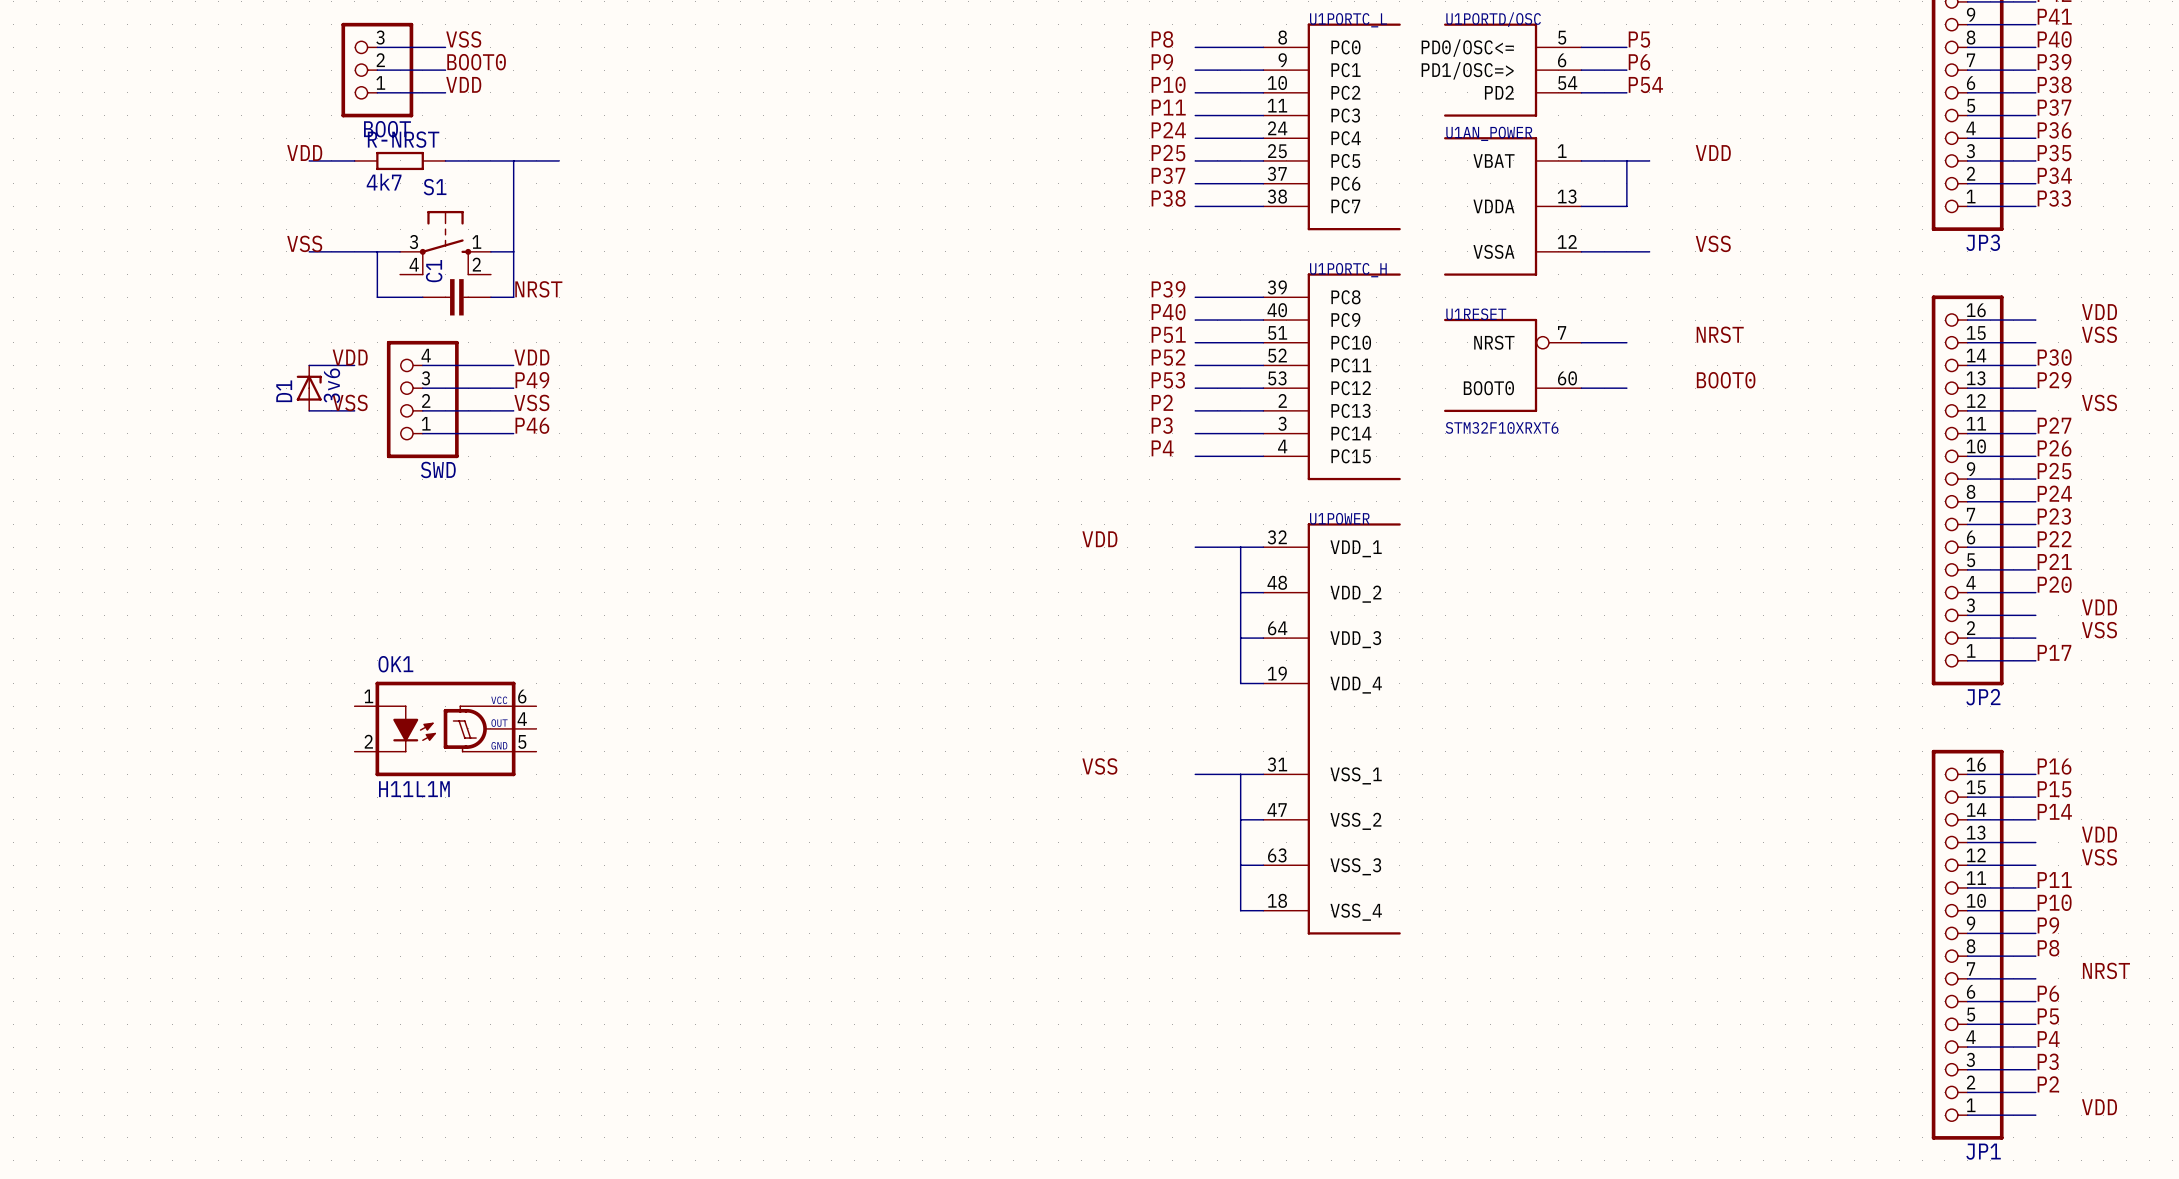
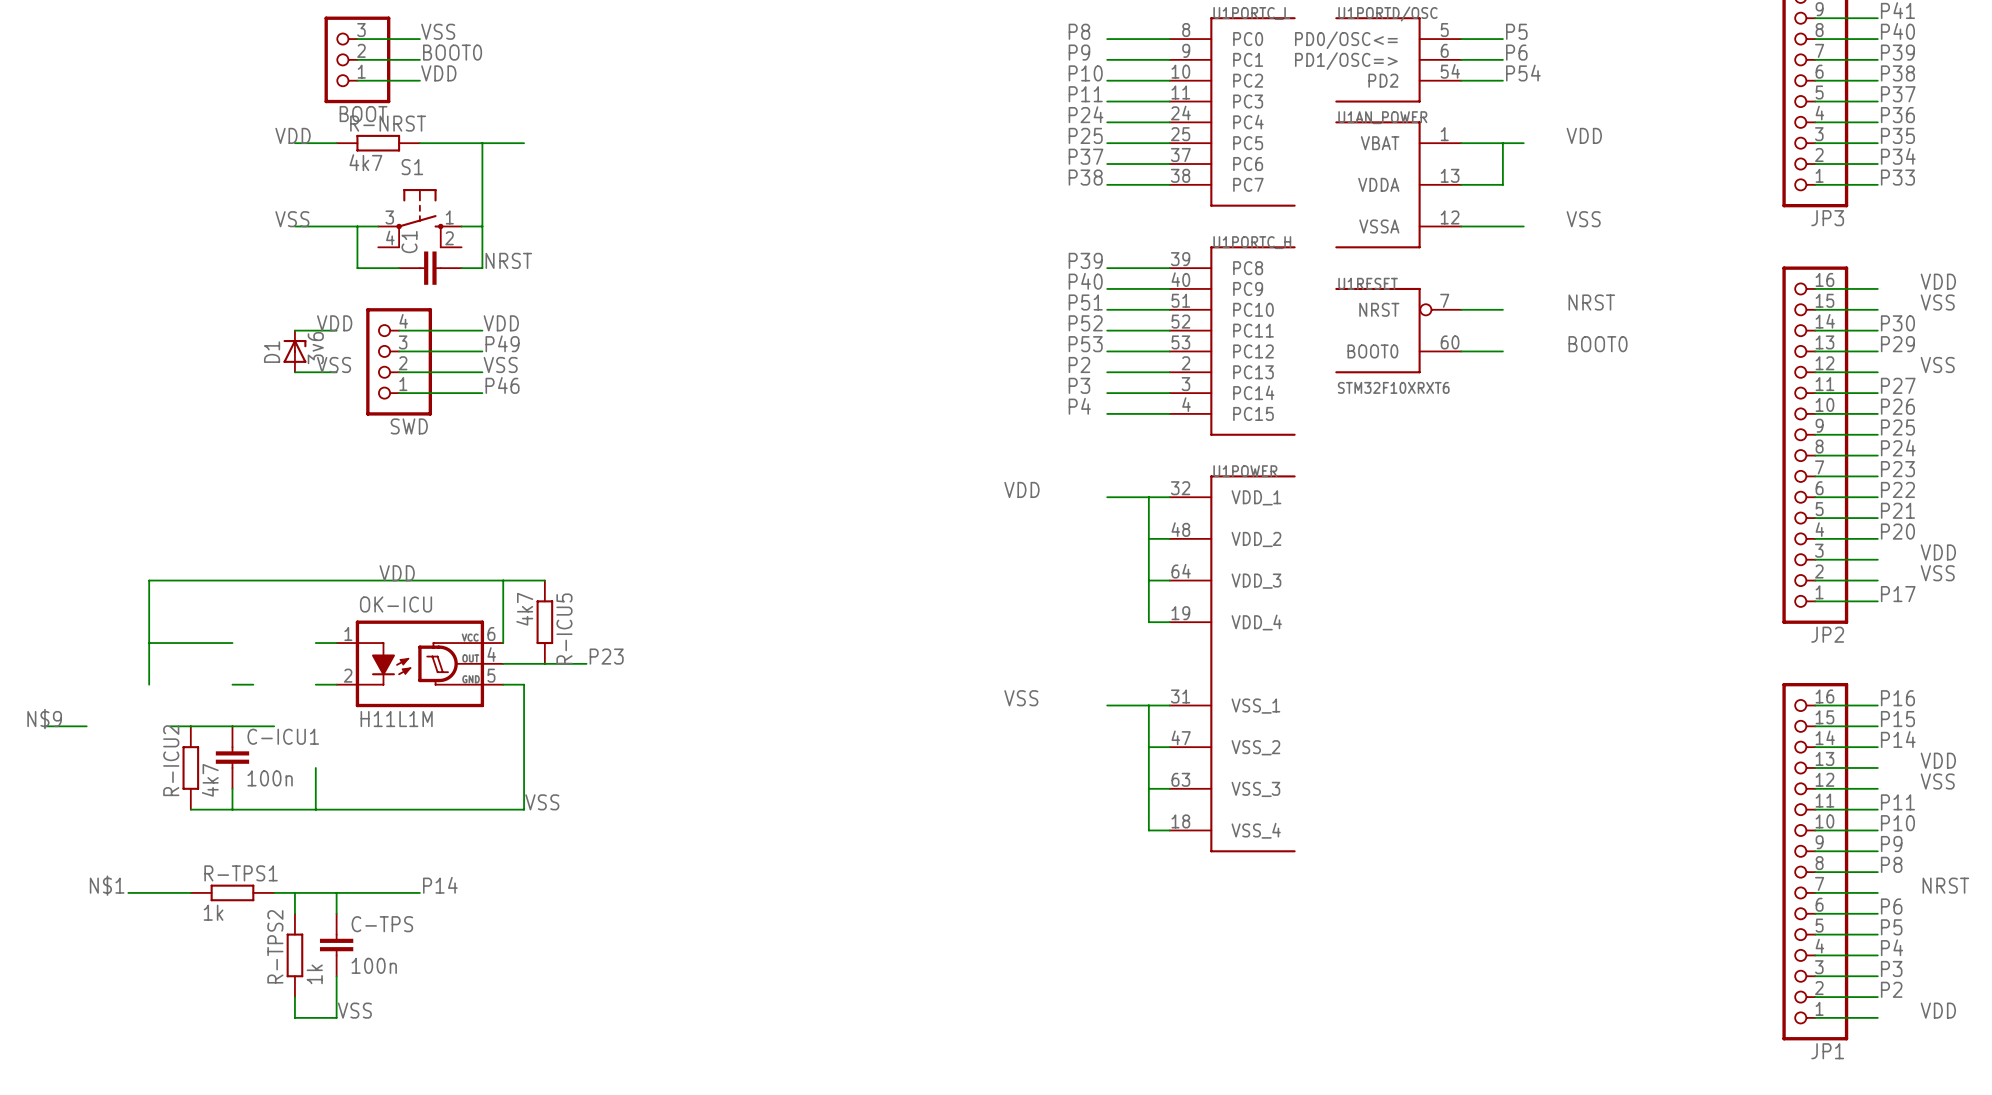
label: none -> VDD (397, 573)
wire: none -> (503, 580) (503, 643)
wire: none -> (544, 580) (149, 580) (149, 684)
OK1 name: OK1 (395, 664) -> OK-ICU (396, 604)
R-ICU5: none -> 4k7 (544, 622)
wire: none -> (149, 643) (232, 643)
wire: none -> (315, 643) (336, 643)
label: none -> P23 (606, 656)
wire: none -> (503, 663) (586, 663)
wire: none -> (232, 684) (253, 684)
wire: none -> (315, 684) (336, 684)
wire: none -> (503, 684) (524, 684) (524, 809) (190, 809)
label: none -> N$9 (44, 719)
wire: none -> (45, 726) (86, 726)
wire: none -> (170, 726) (274, 726)
C-ICU1: none -> 100n (232, 757)
R-ICU2: none -> 4k7 (190, 767)
wire: none -> (315, 767) (315, 809)
wire: none -> (232, 788) (232, 809)
label: none -> VSS (542, 802)
label: none -> N$1 (107, 885)
label: none -> P14 (440, 885)
wire: none -> (128, 892) (190, 892)
R-TPS1: none -> 1k (232, 892)
wire: none -> (274, 892) (419, 892)
wire: none -> (294, 892) (294, 913)
wire: none -> (336, 892) (336, 913)
C-TPS: none -> 100n (336, 945)
R-TPS2: none -> 1k (294, 955)
wire: none -> (336, 976) (336, 1017) (294, 1017) (294, 997)
label: none -> VSS (354, 1010)

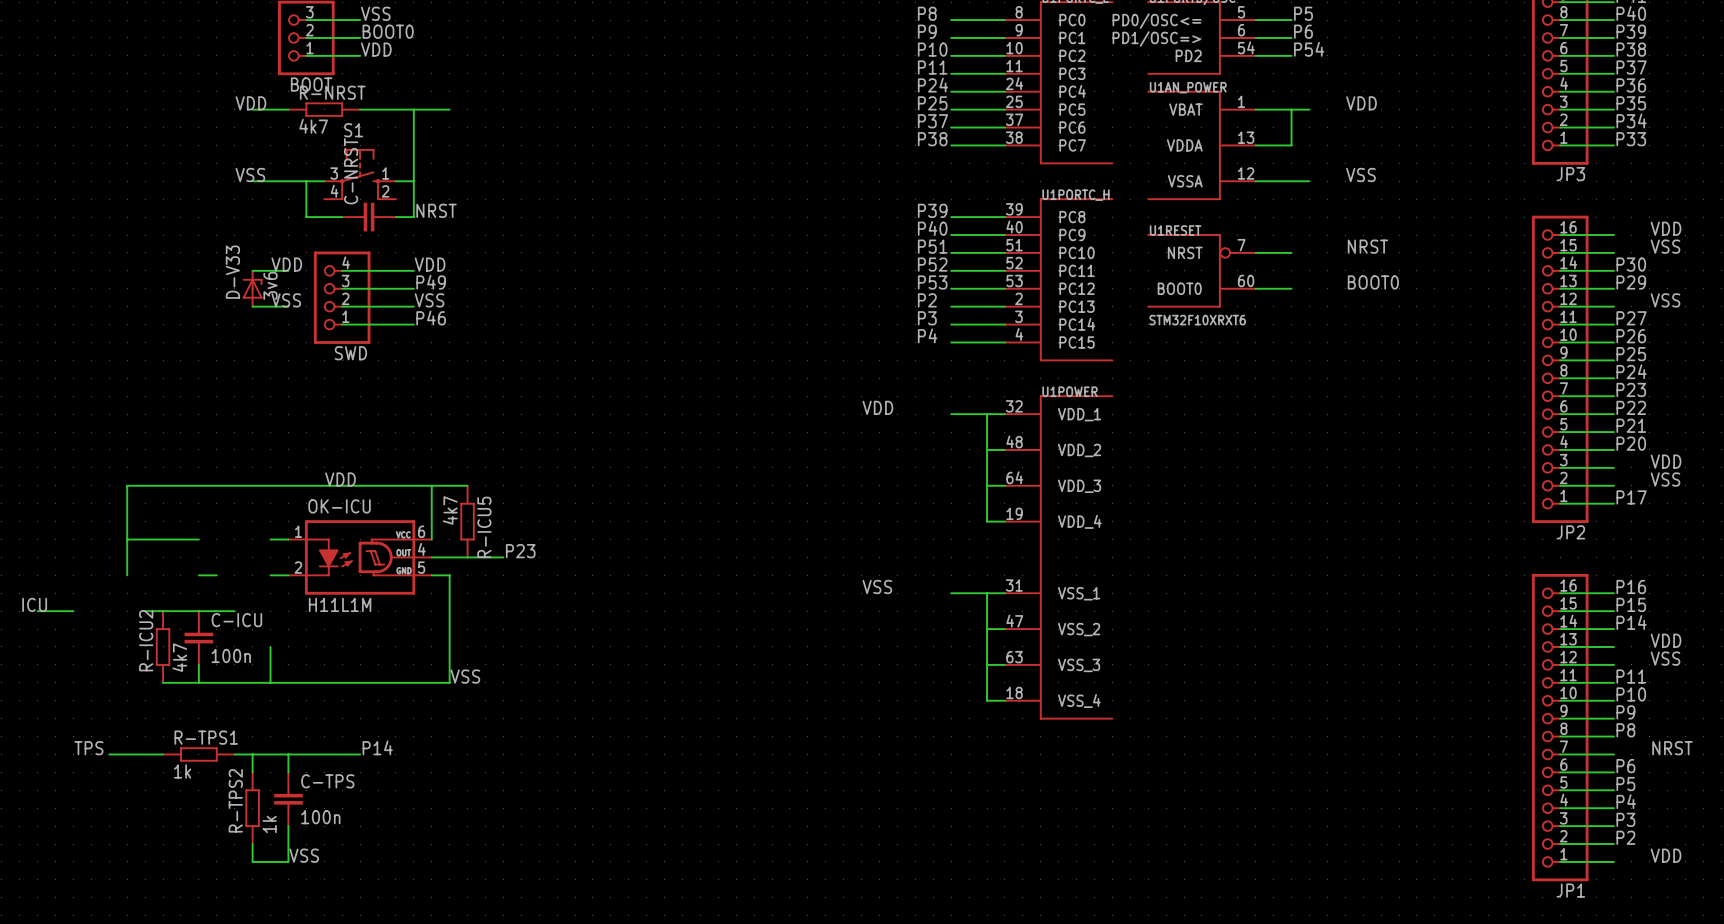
C1 name: C1 (409, 242) -> C-NRST (351, 171)
D1 name: D1 (272, 352) -> D-V33 (232, 272)
label: N$9 (44, 719) -> ICU (34, 604)
C-ICU1 name: C-ICU1 (283, 736) -> C-ICU (236, 620)
label: N$1 (107, 885) -> TPS (88, 748)

